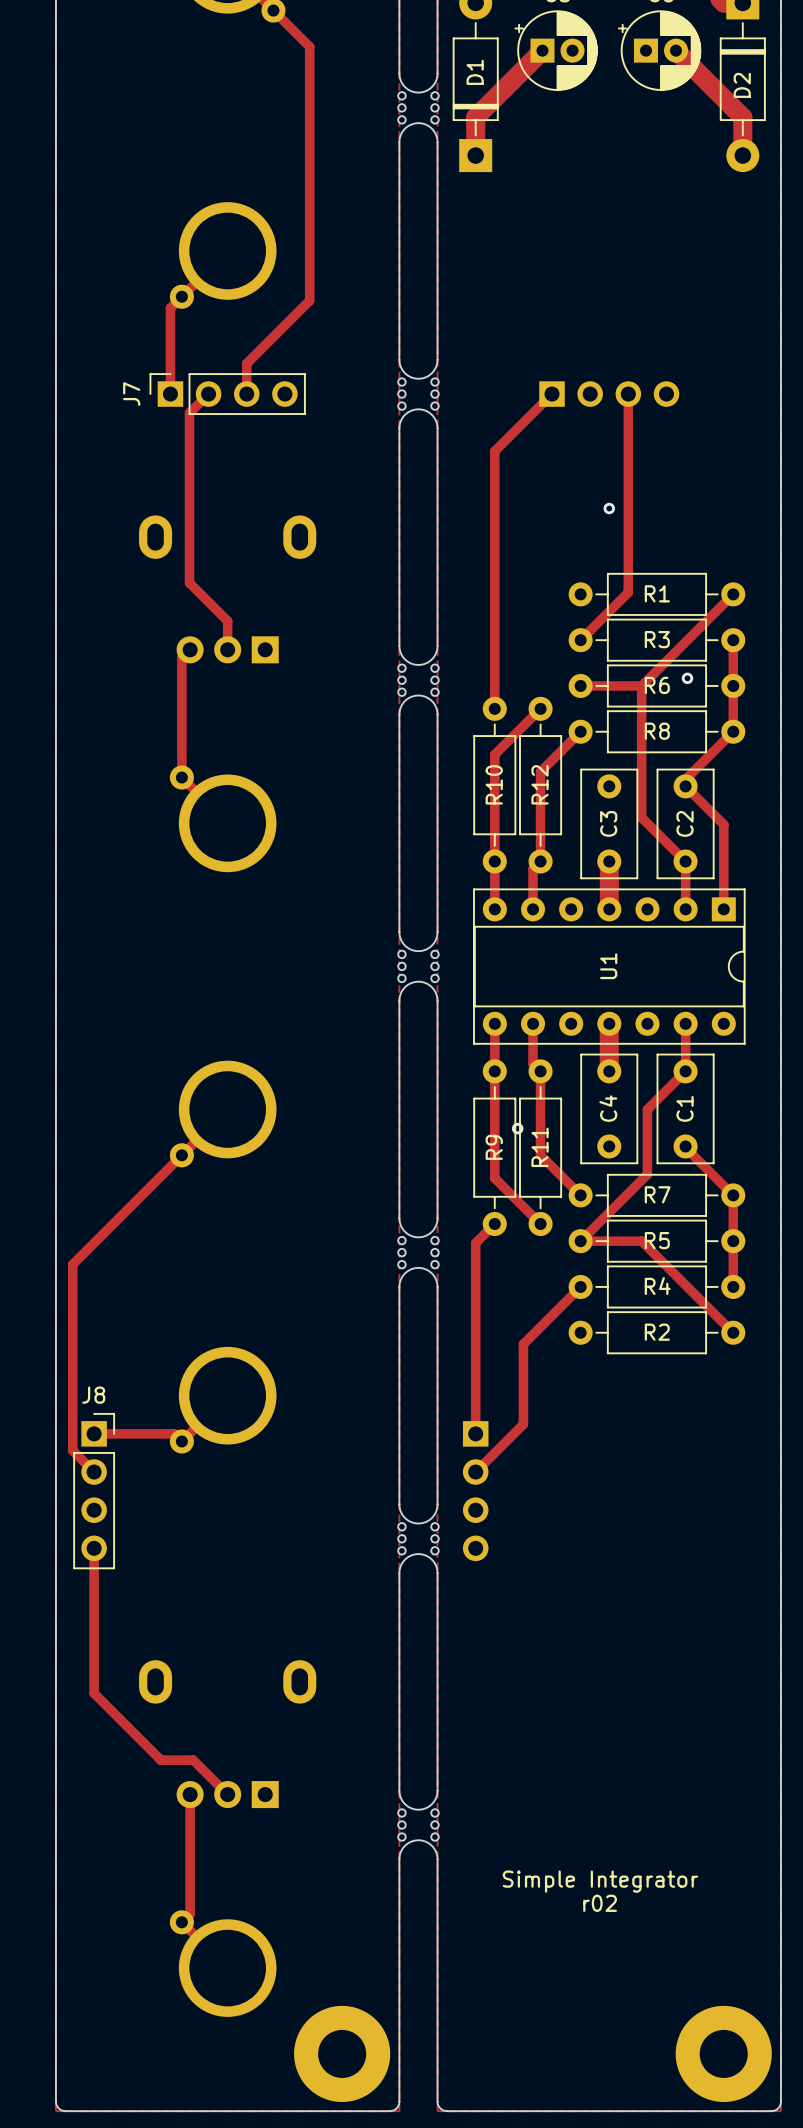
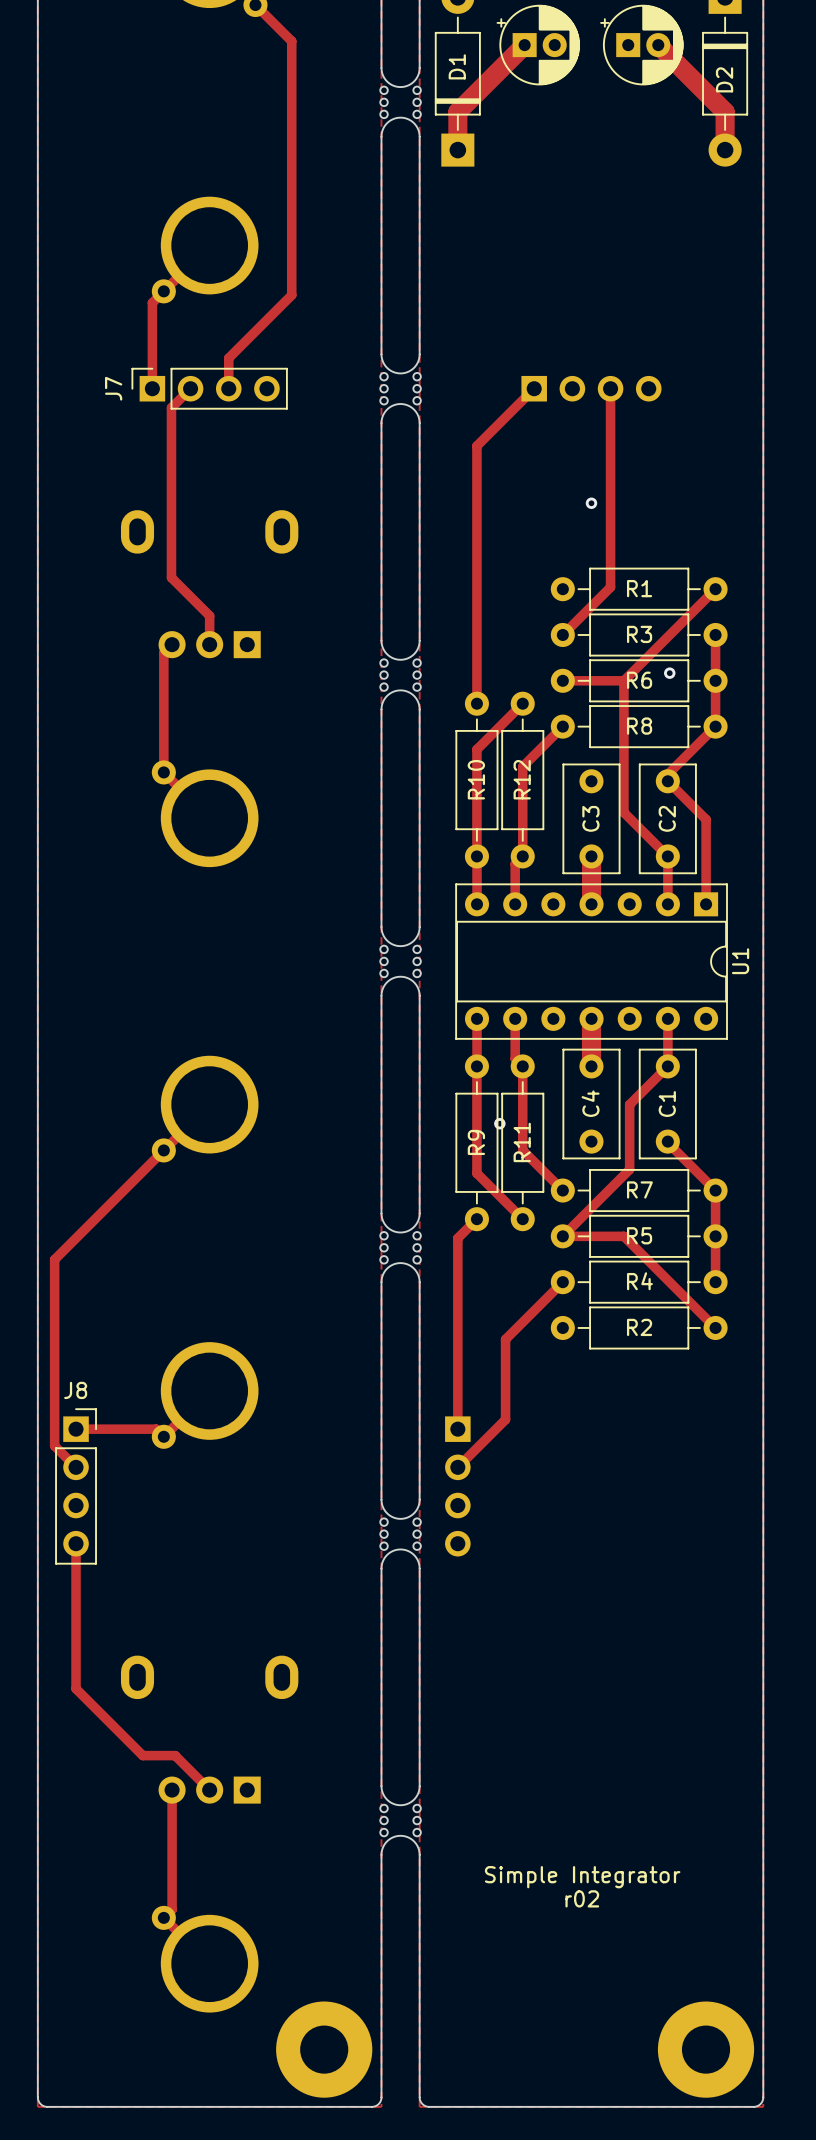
U1 name position: U1 (608, 966) -> U1 (740, 961)

